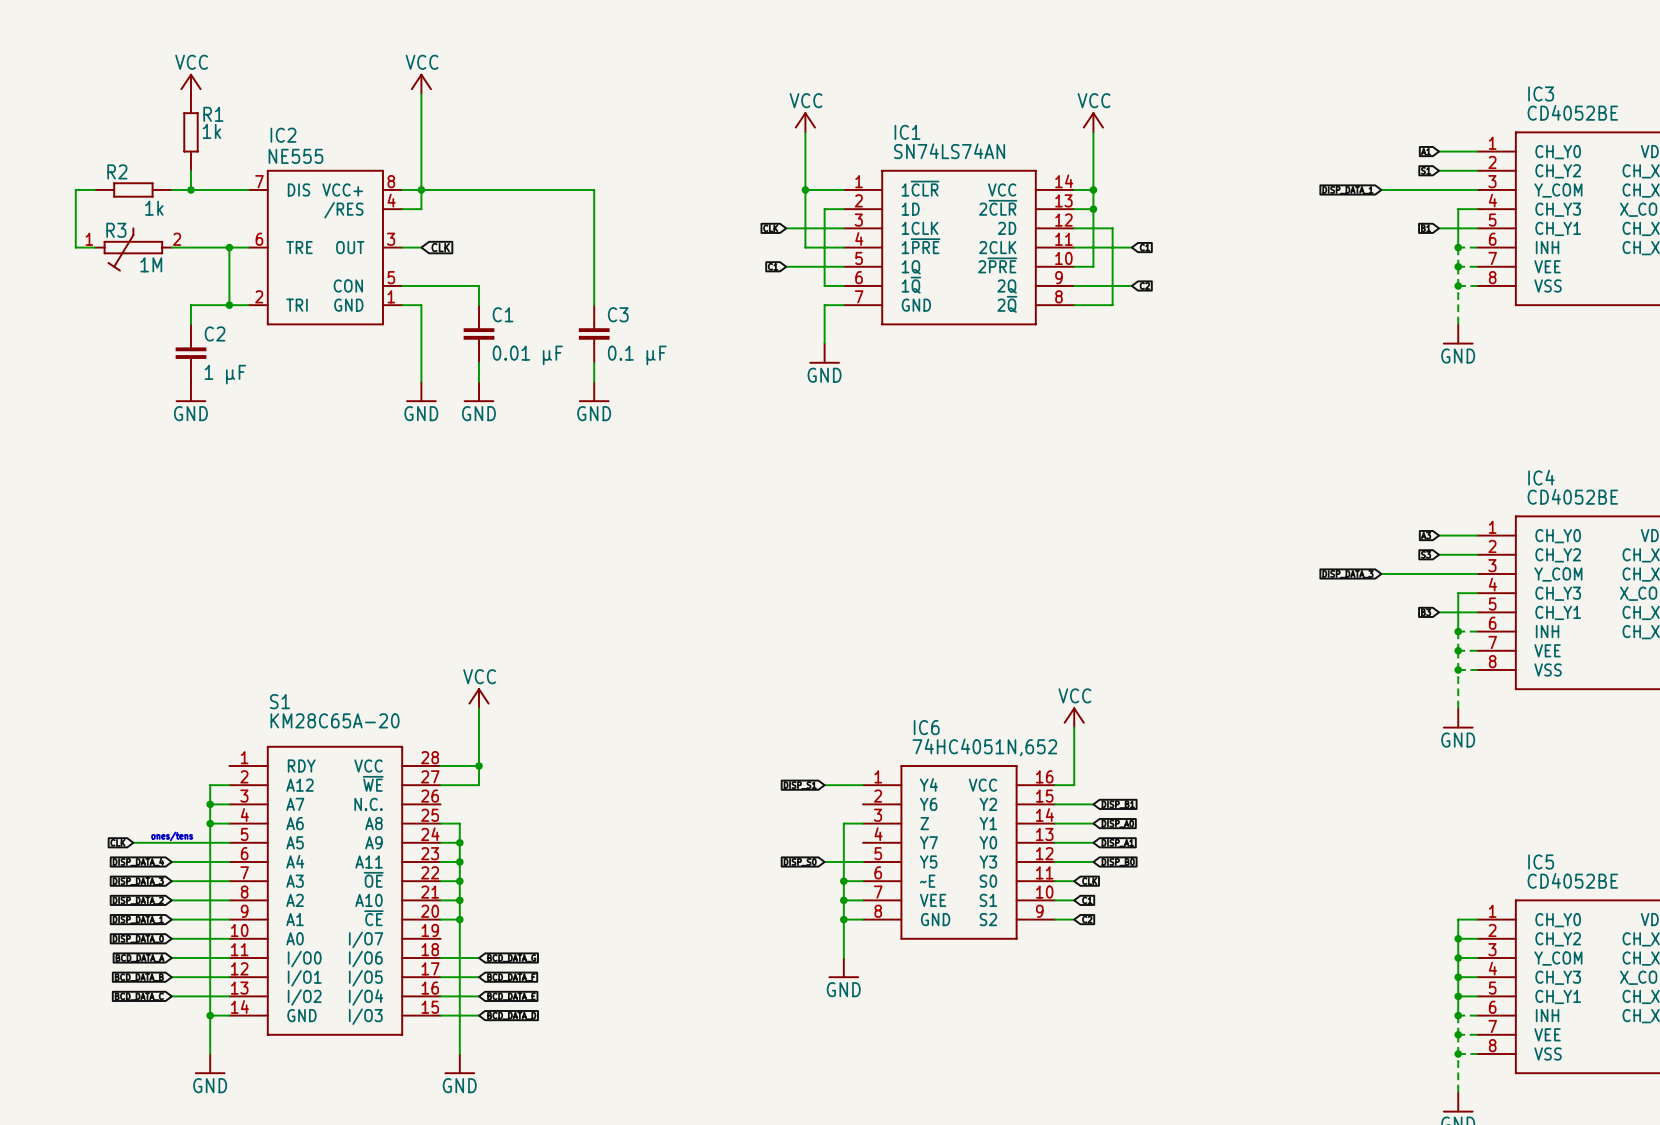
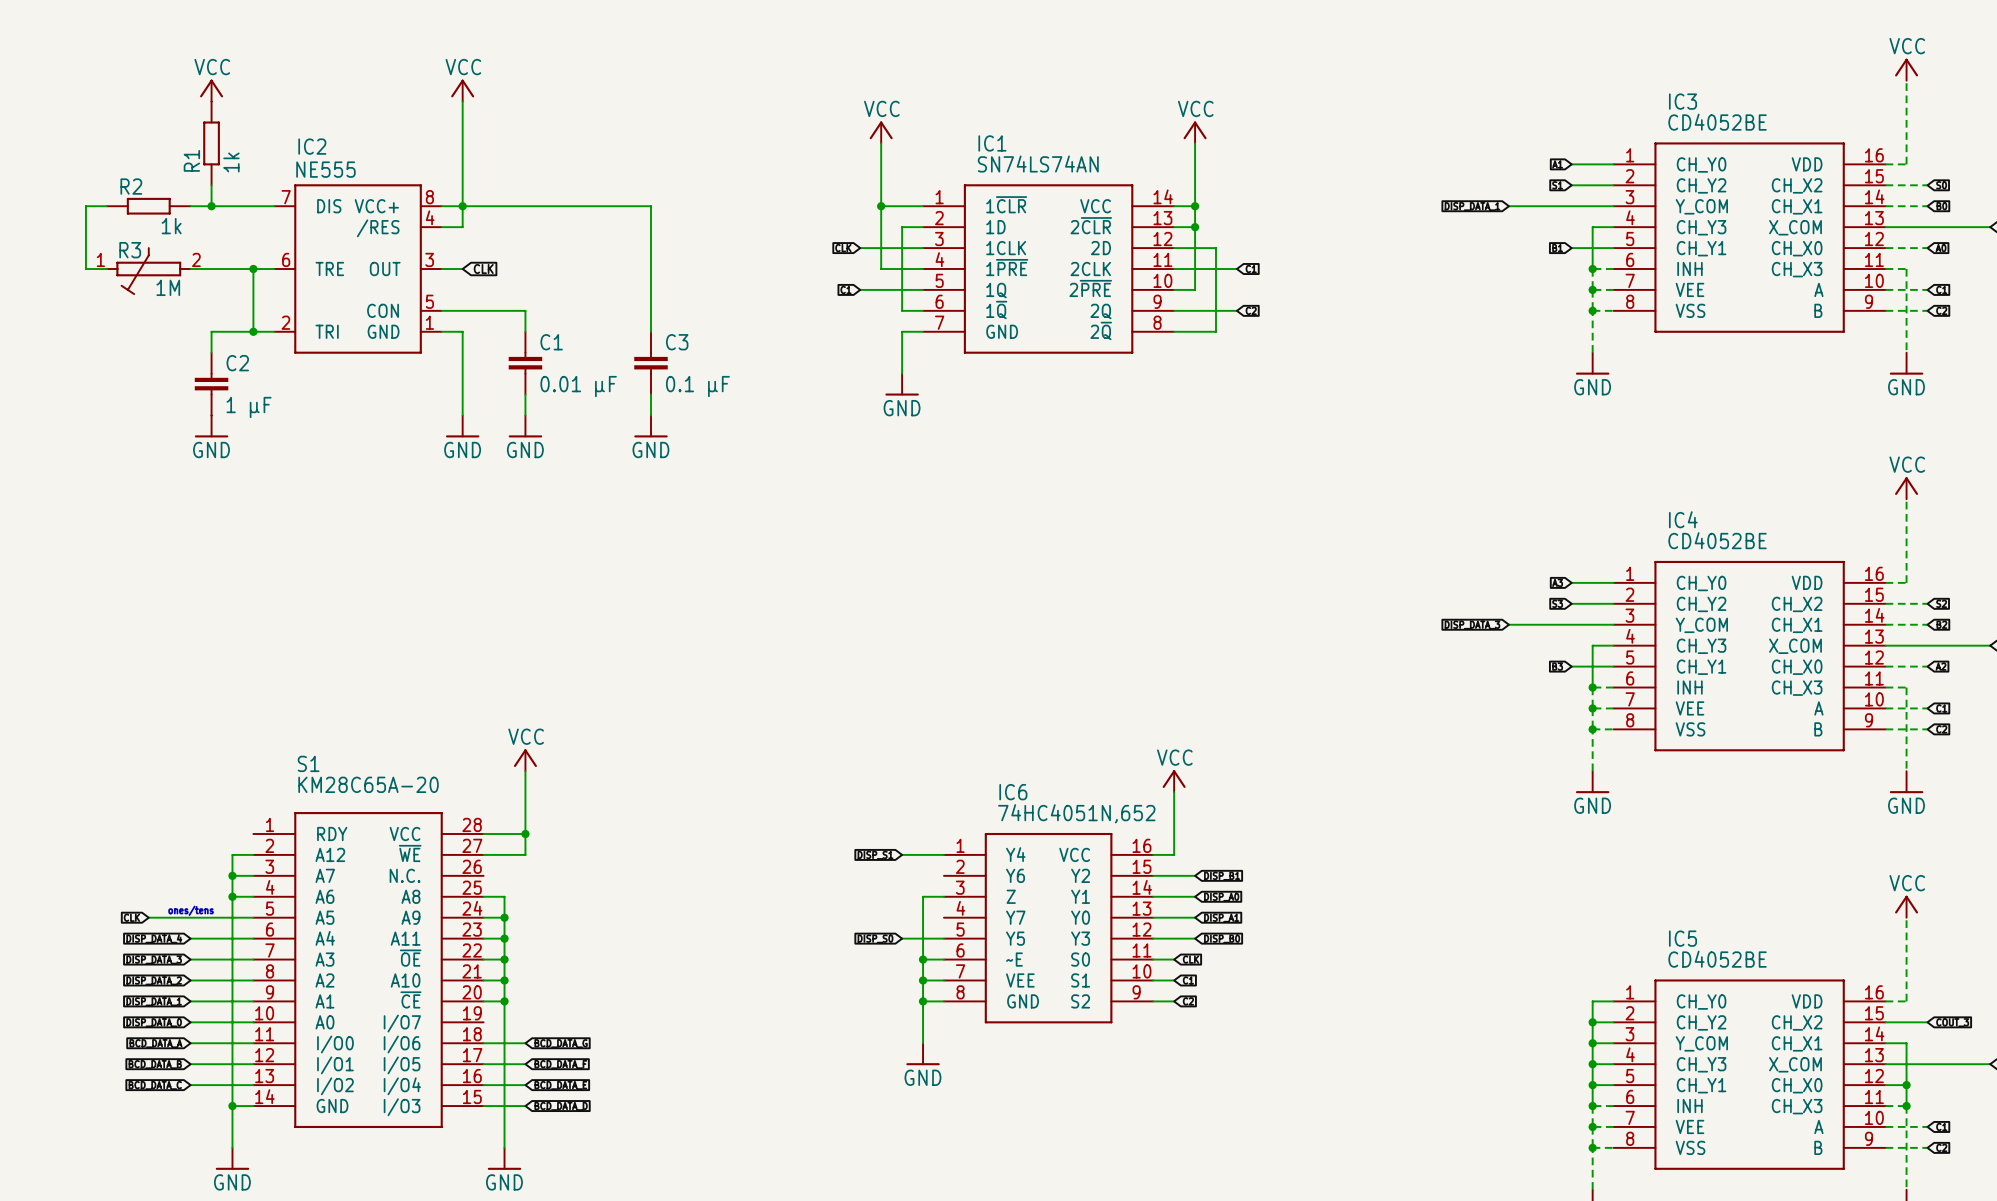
R1 name rotation: 0° (213, 114) -> 90° counterclockwise (191, 160)
R1 name position: R1 (213, 114) -> R1 (191, 160)
R1 value rotation: 0° (211, 131) -> 90° counterclockwise (231, 162)

